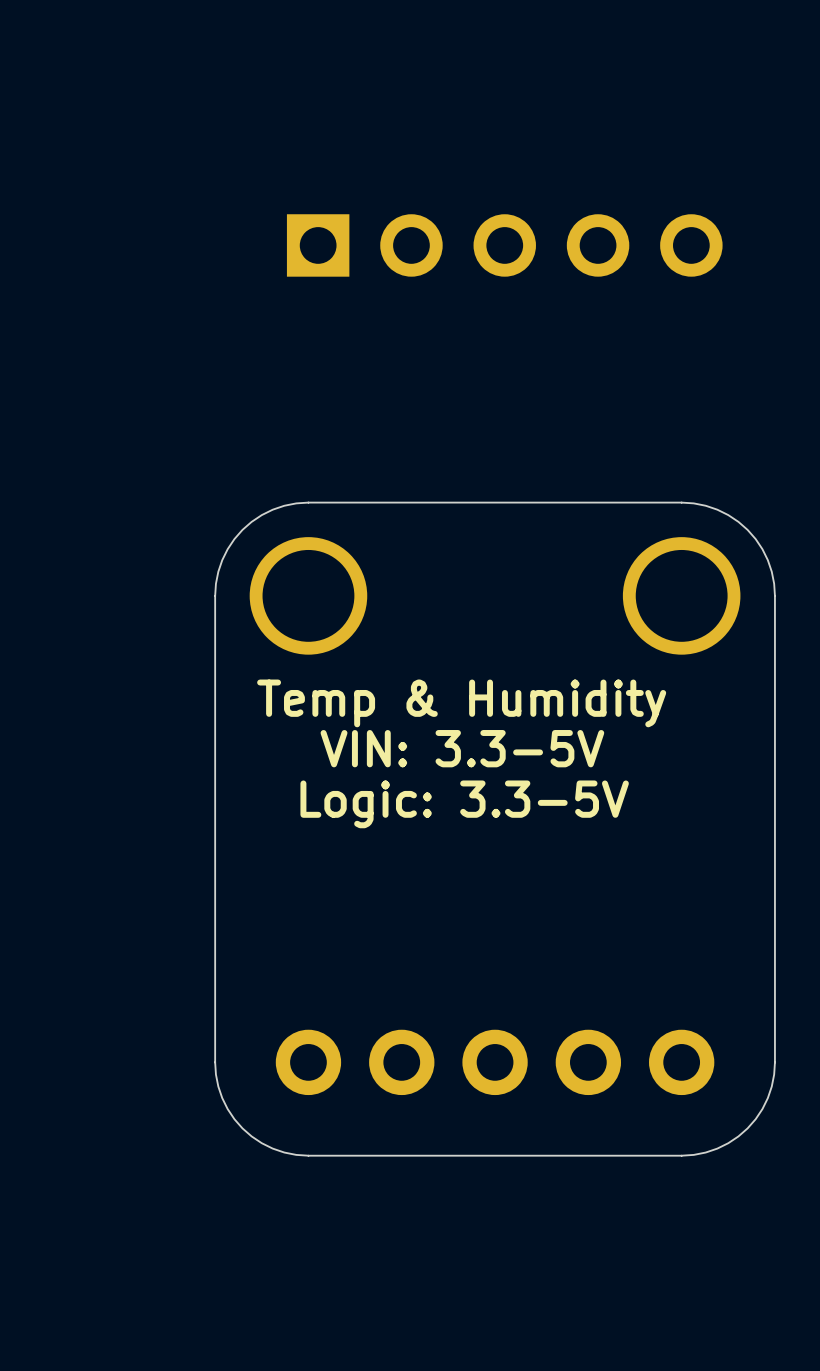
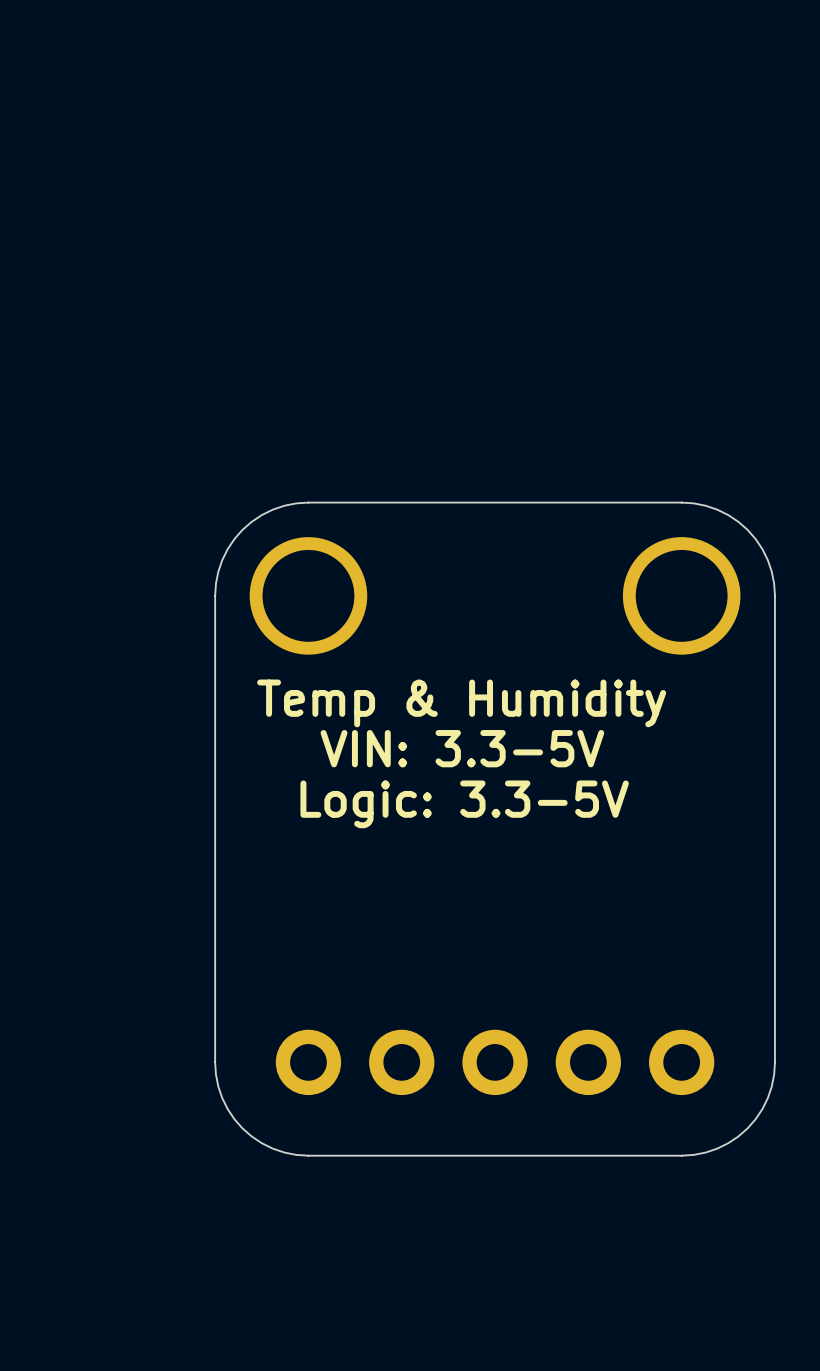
part: (504, 245) -> none

